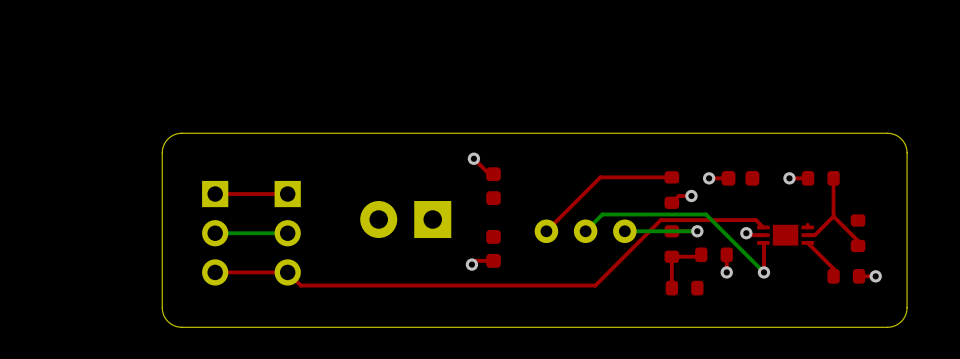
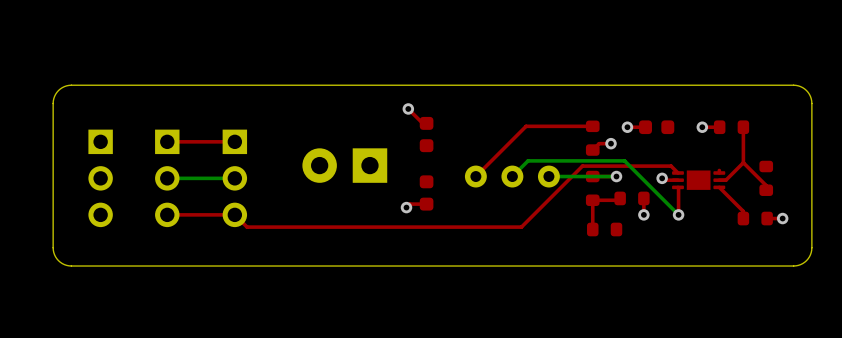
board edge: (181, 133) (168, 139) (162, 152) (162, 310) (168, 321) (181, 327) -> (136, 85) (66, 85) (56, 92) (53, 103) (53, 247) (55, 256) (62, 263) (69, 265) (136, 266)
part: none -> (100, 178)

